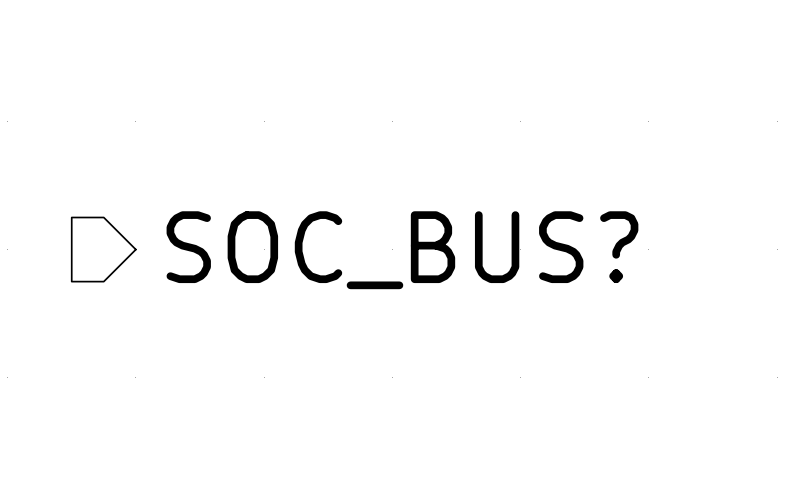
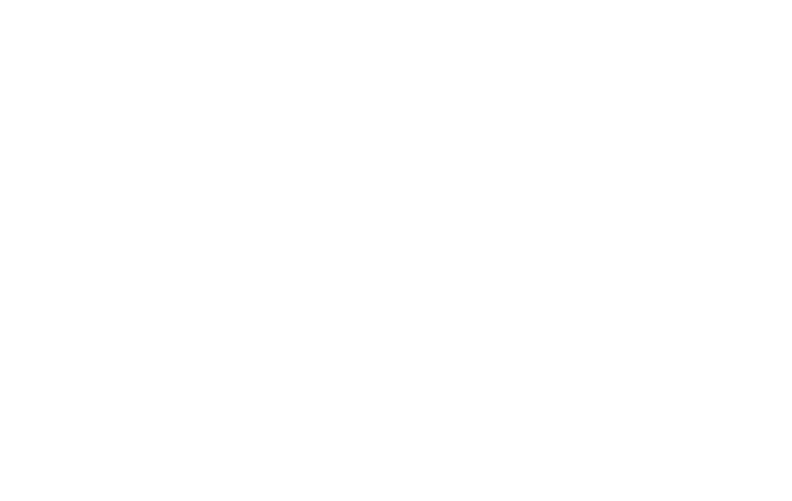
hierarchical label: SOC_BUS? (402, 250) -> none

